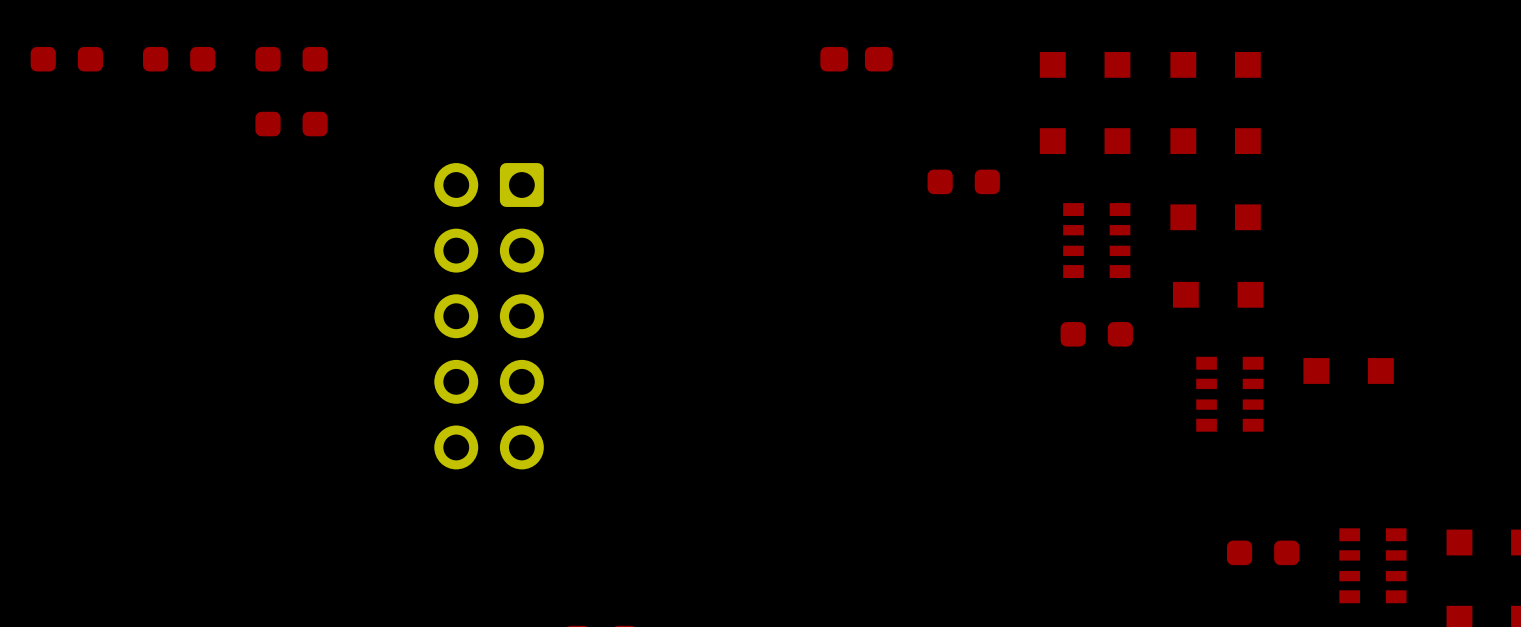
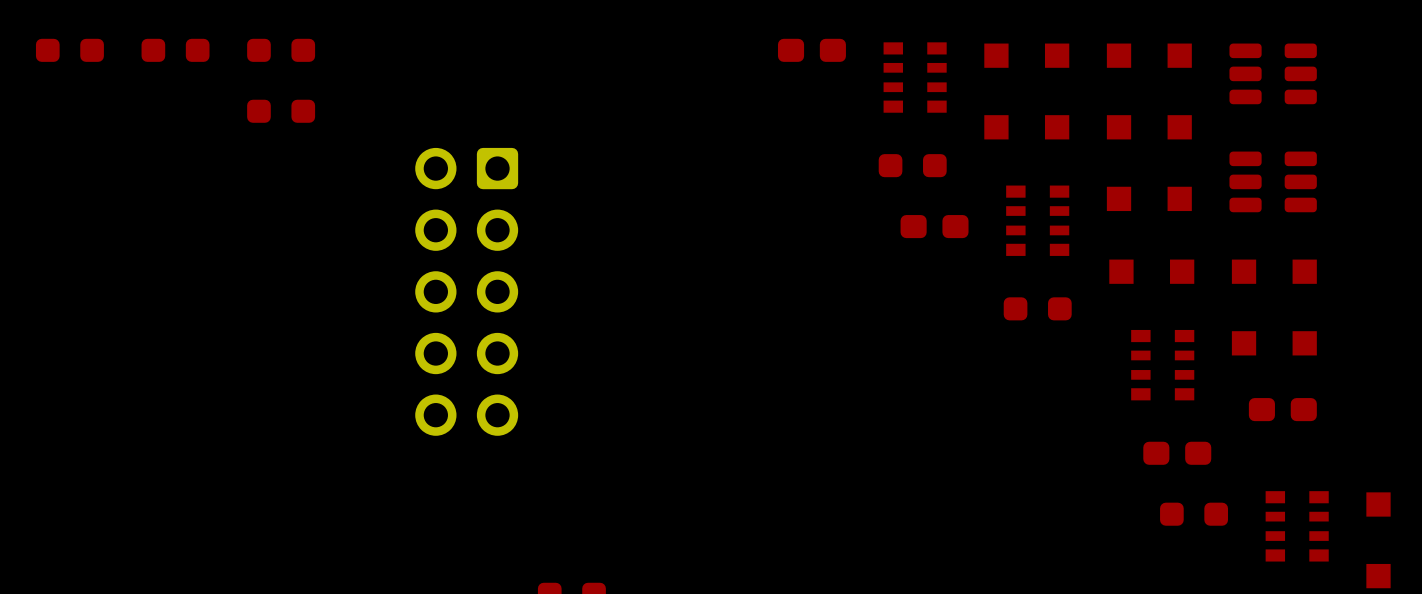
part: none -> (1273, 73)
part: none -> (915, 77)
part: none -> (1273, 181)
part: none -> (934, 226)
part: none -> (1274, 271)
part: none -> (1282, 409)
part: none -> (1177, 453)

